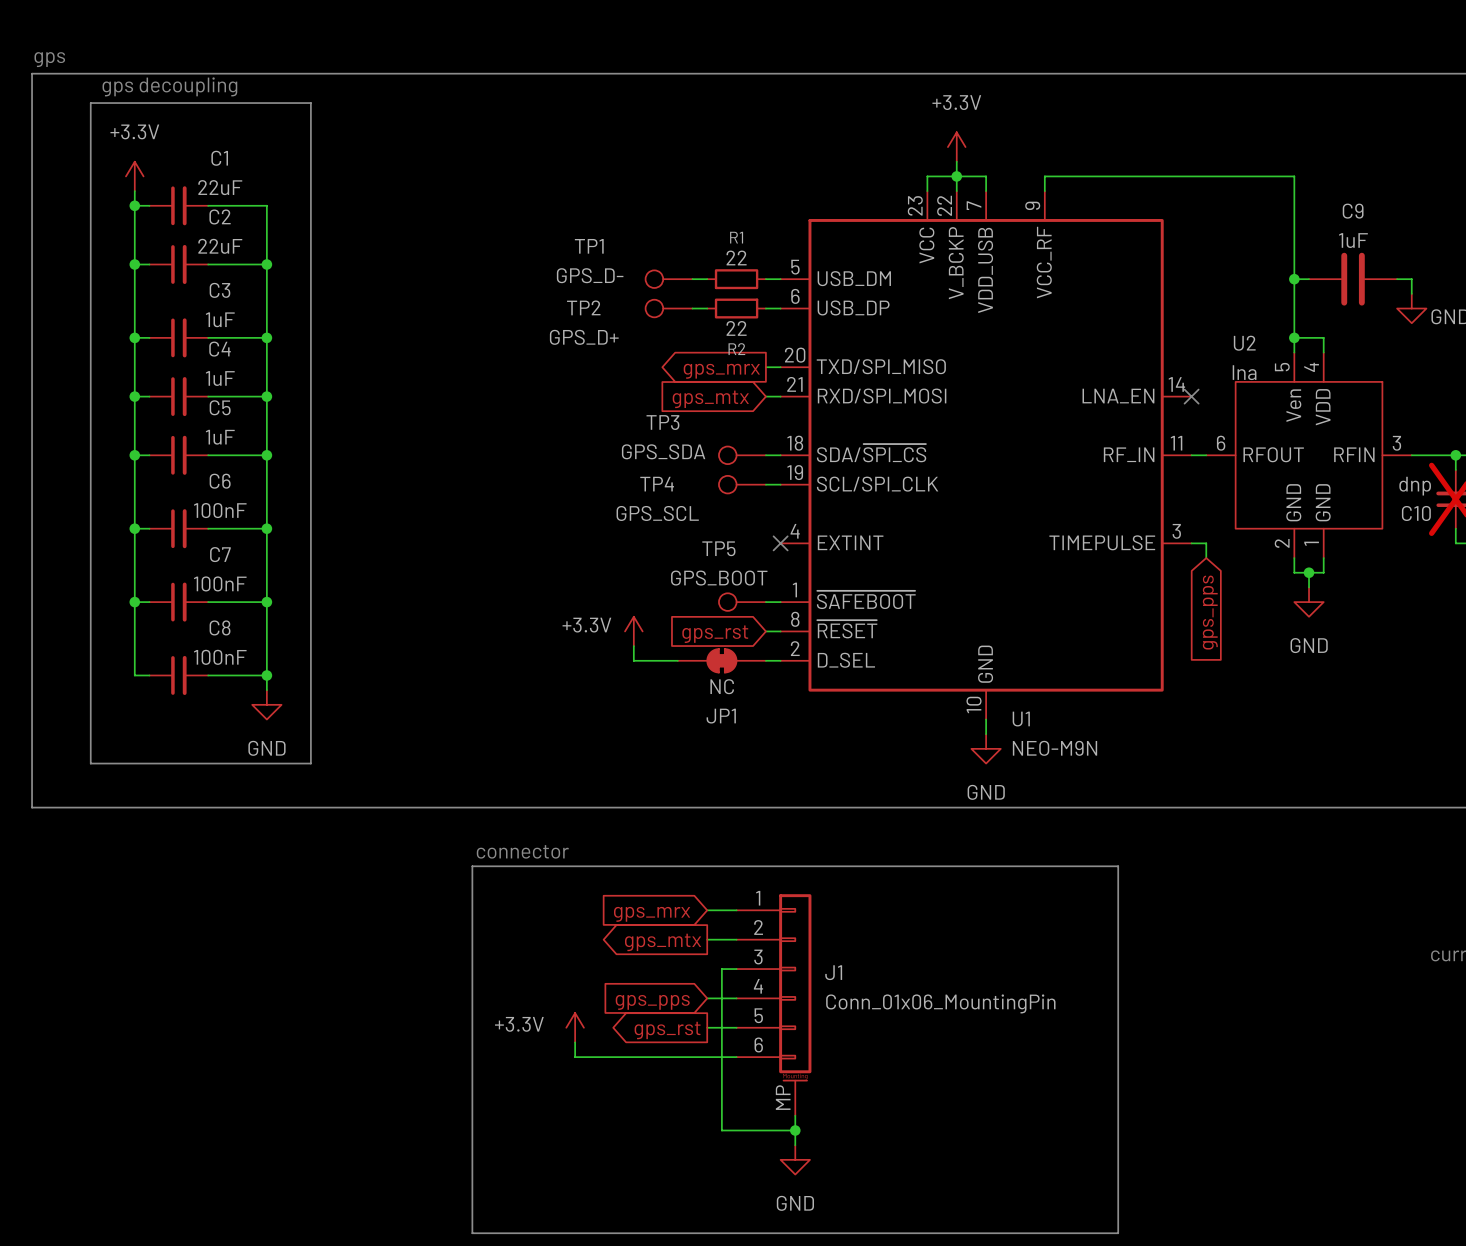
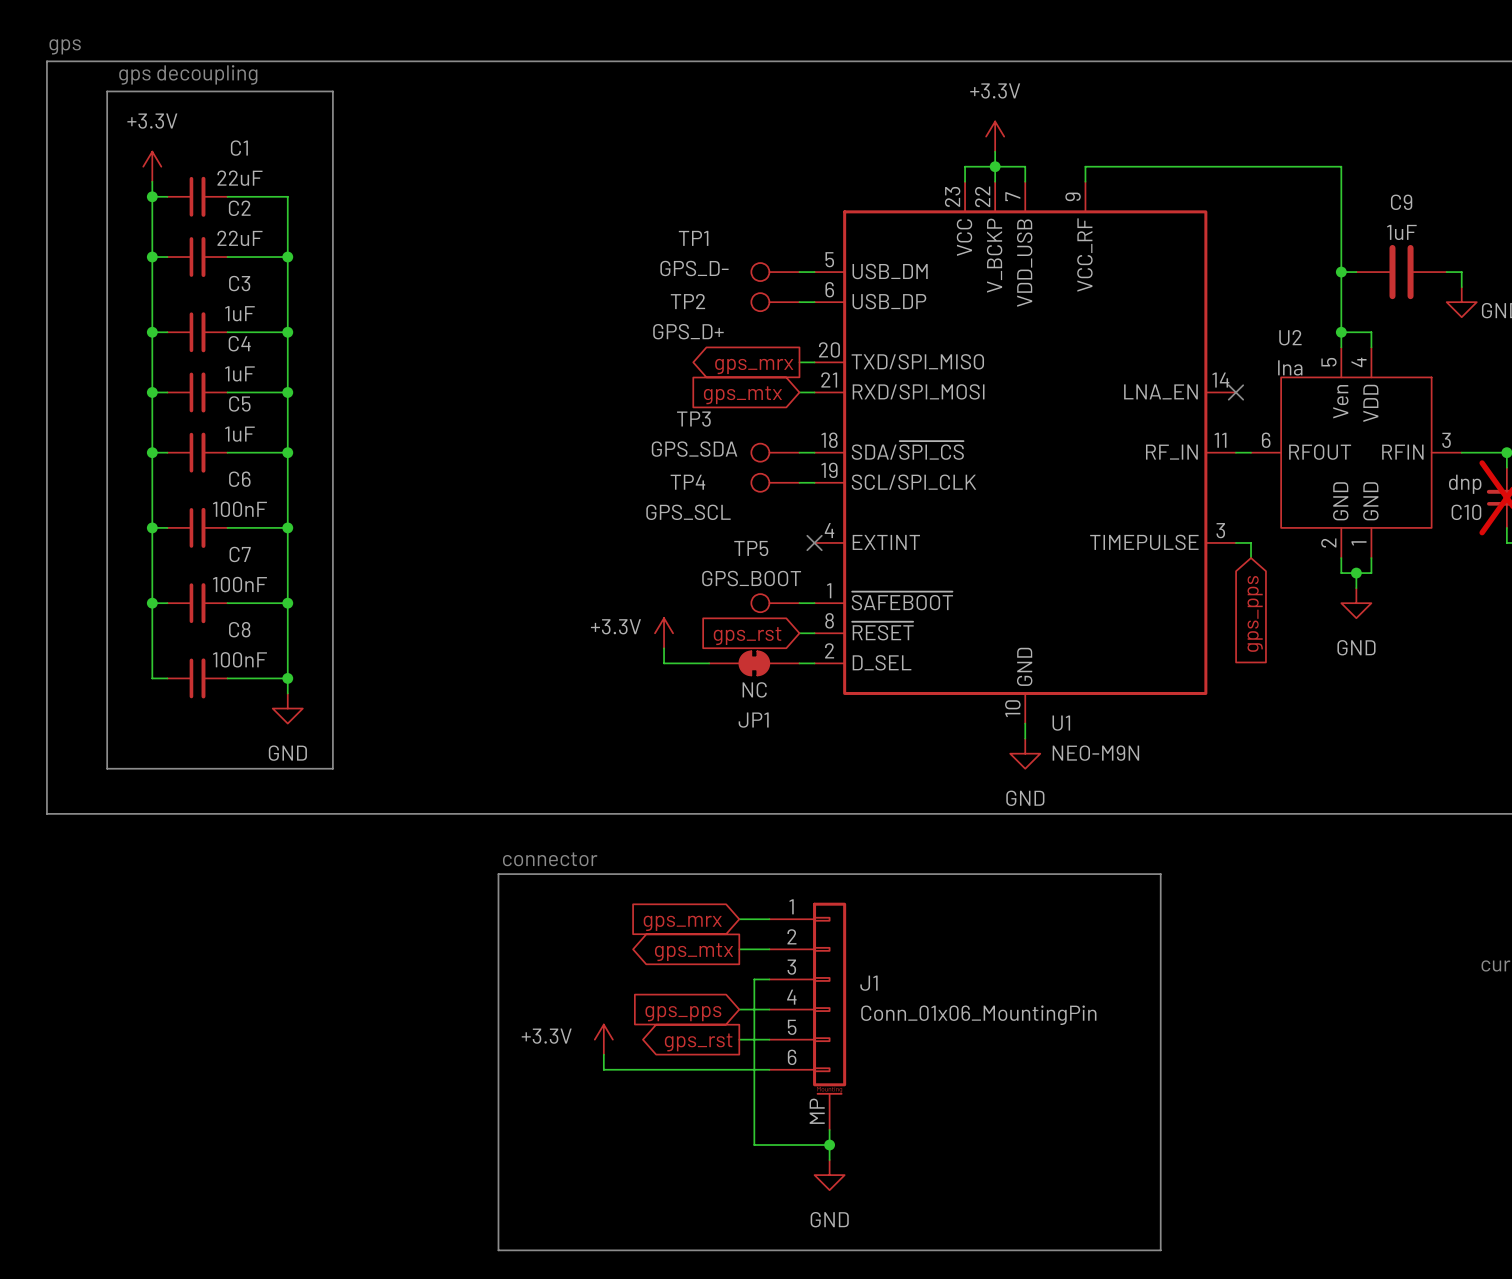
TP1 position: (669, 279) -> (775, 272)
wire: (692, 279) (707, 279) -> none
R1: 22 (736, 279) -> none
TP2 position: (669, 308) -> (775, 302)
wire: (692, 308) (707, 308) -> none
R2: 22 (736, 308) -> none

